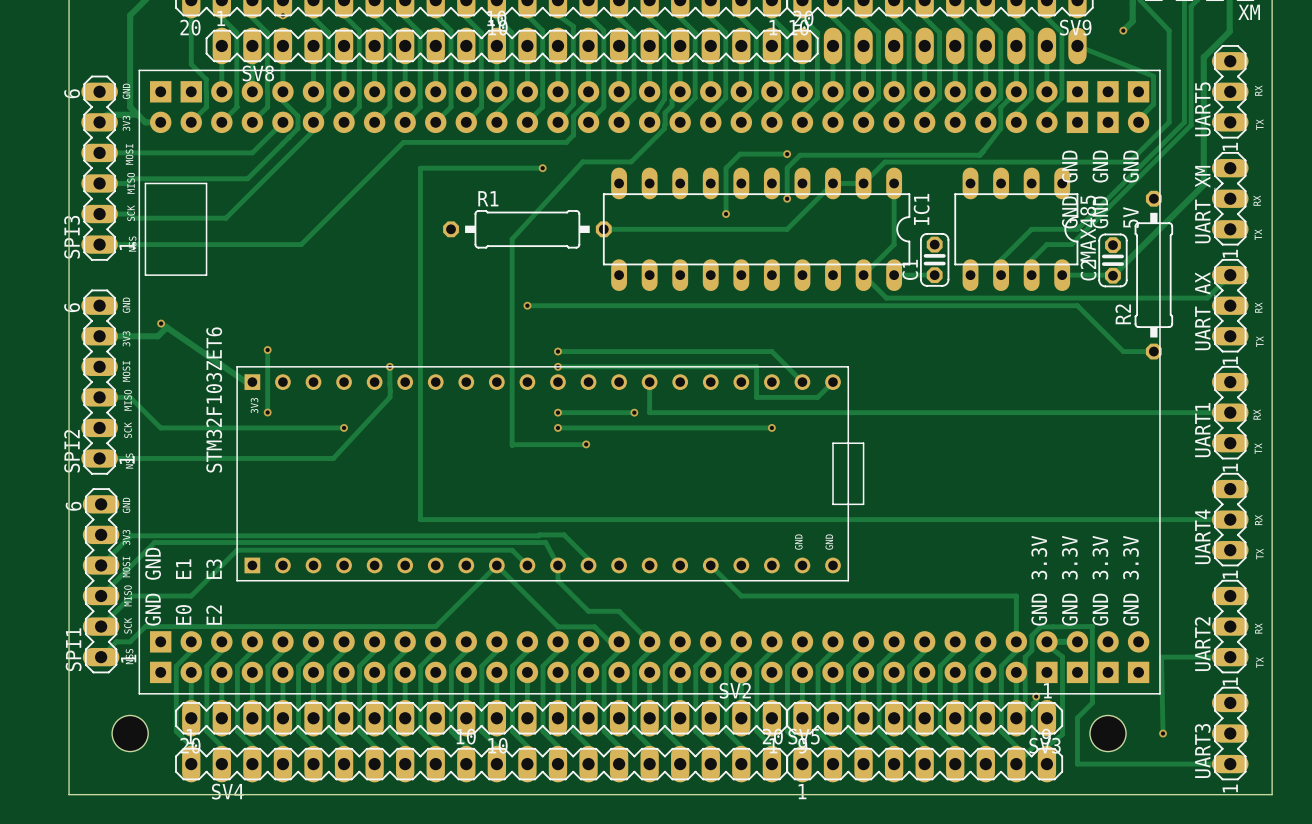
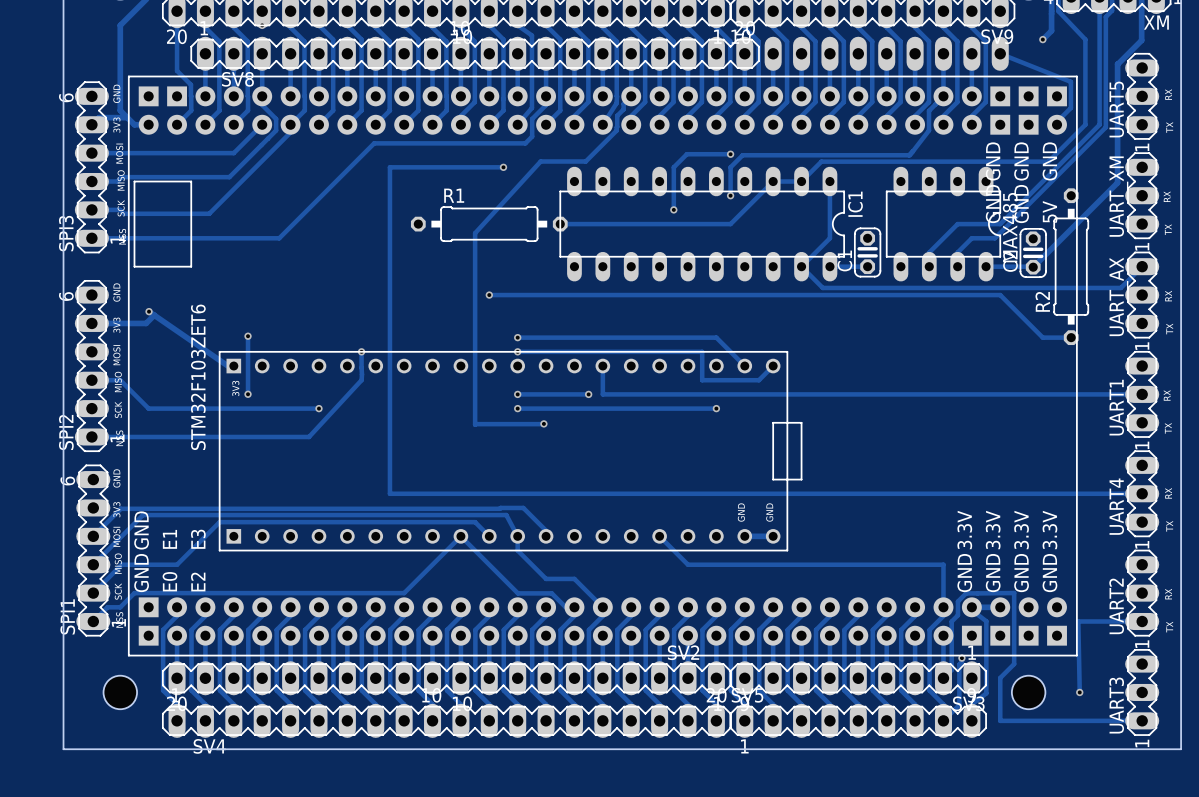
track: none -> (744, 536) (773, 536)

